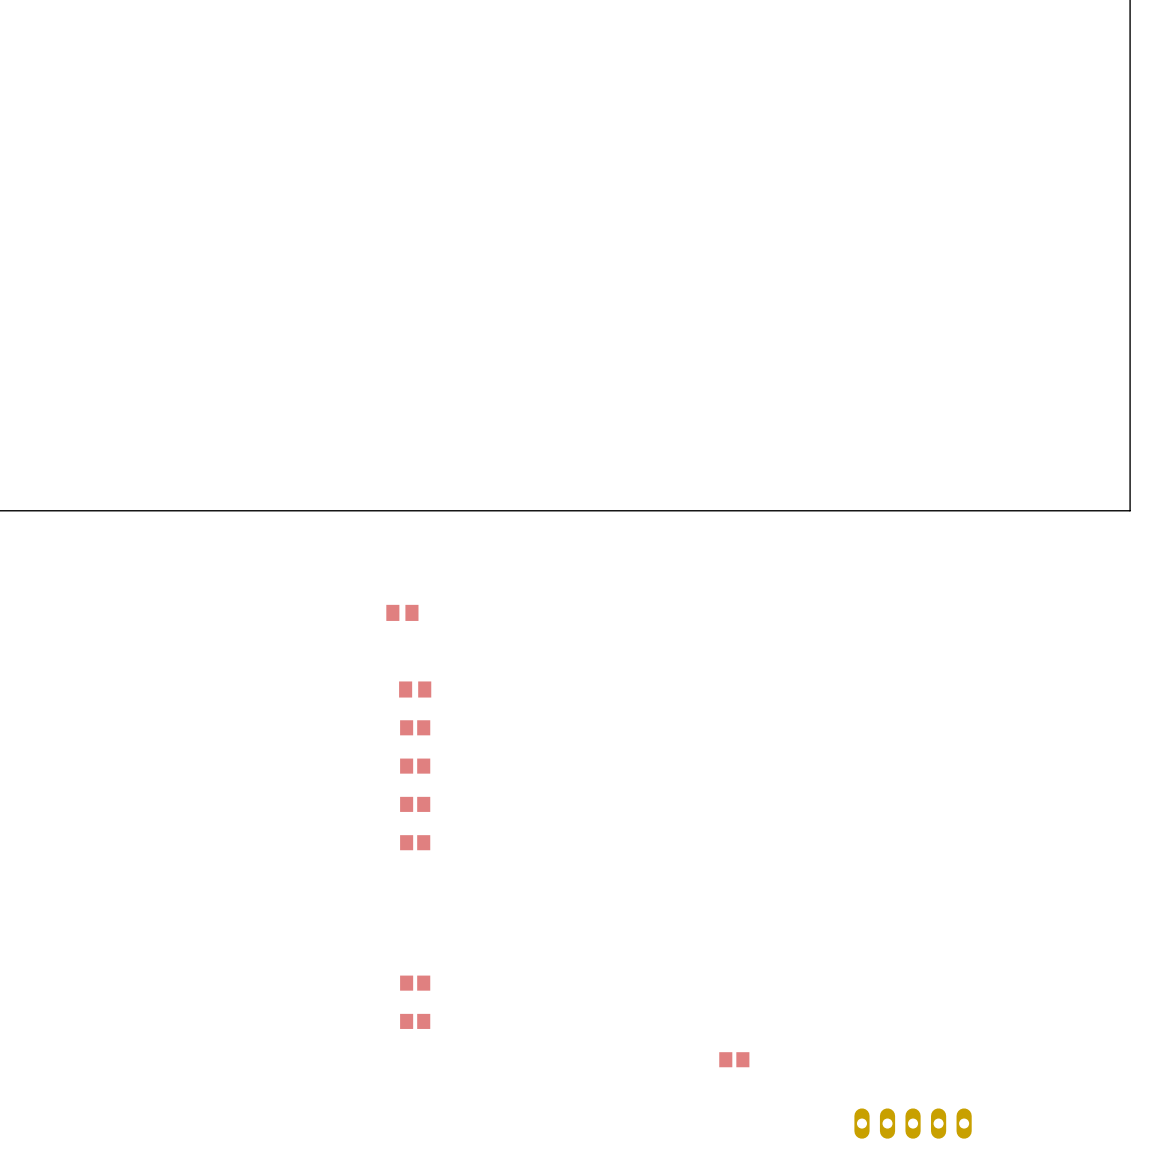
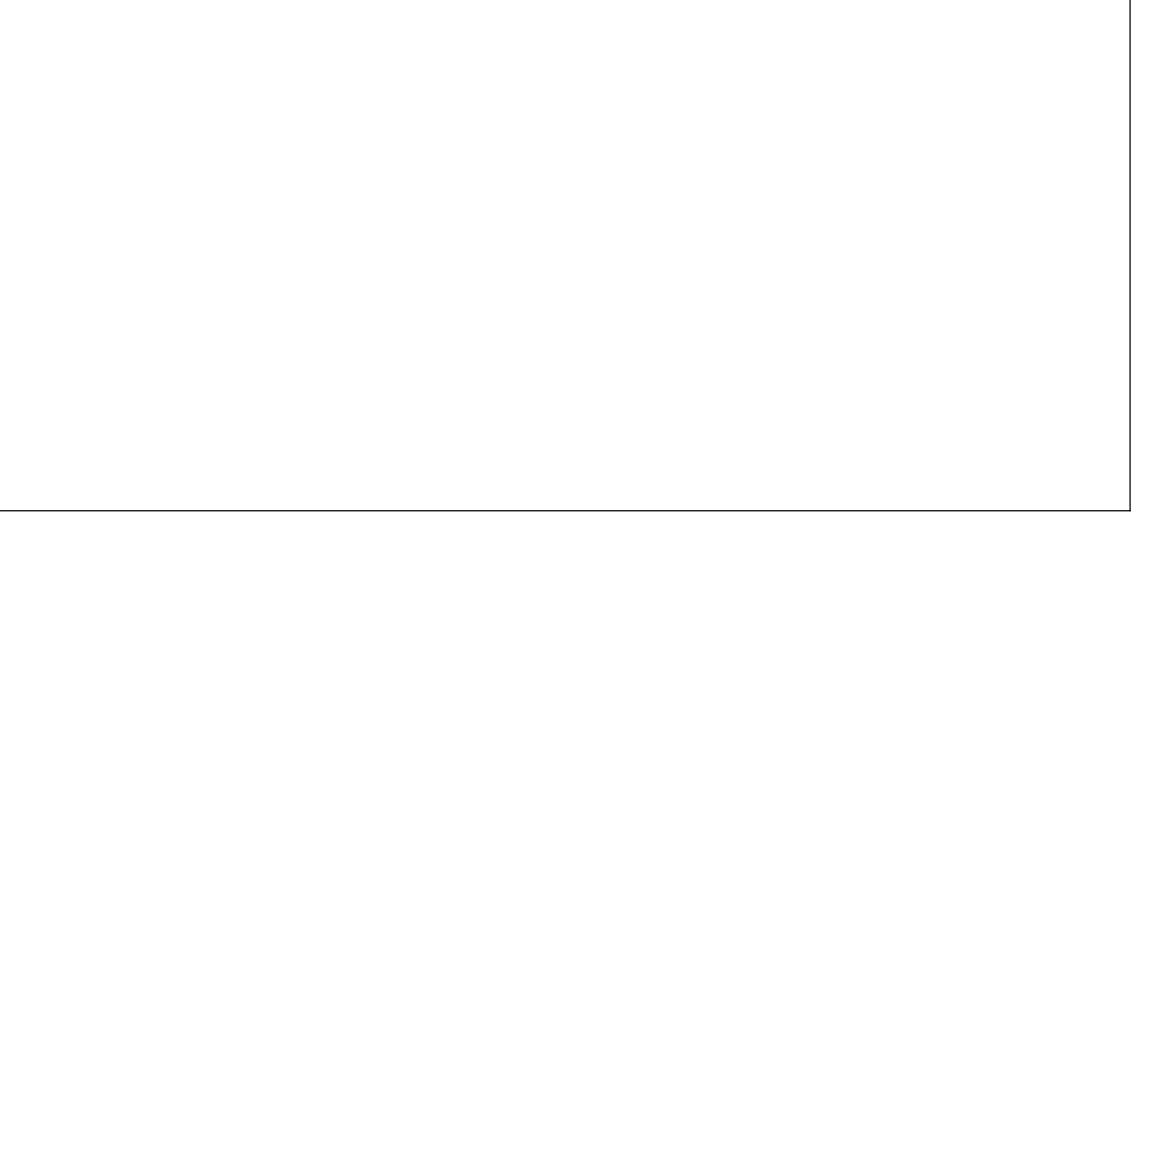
part: (402, 612) -> none
part: (415, 689) -> none
part: (415, 727) -> none
part: (415, 766) -> none
part: (415, 804) -> none
part: (415, 842) -> none
part: (415, 983) -> none
part: (415, 1021) -> none
part: (734, 1059) -> none
part: (913, 1123) -> none

